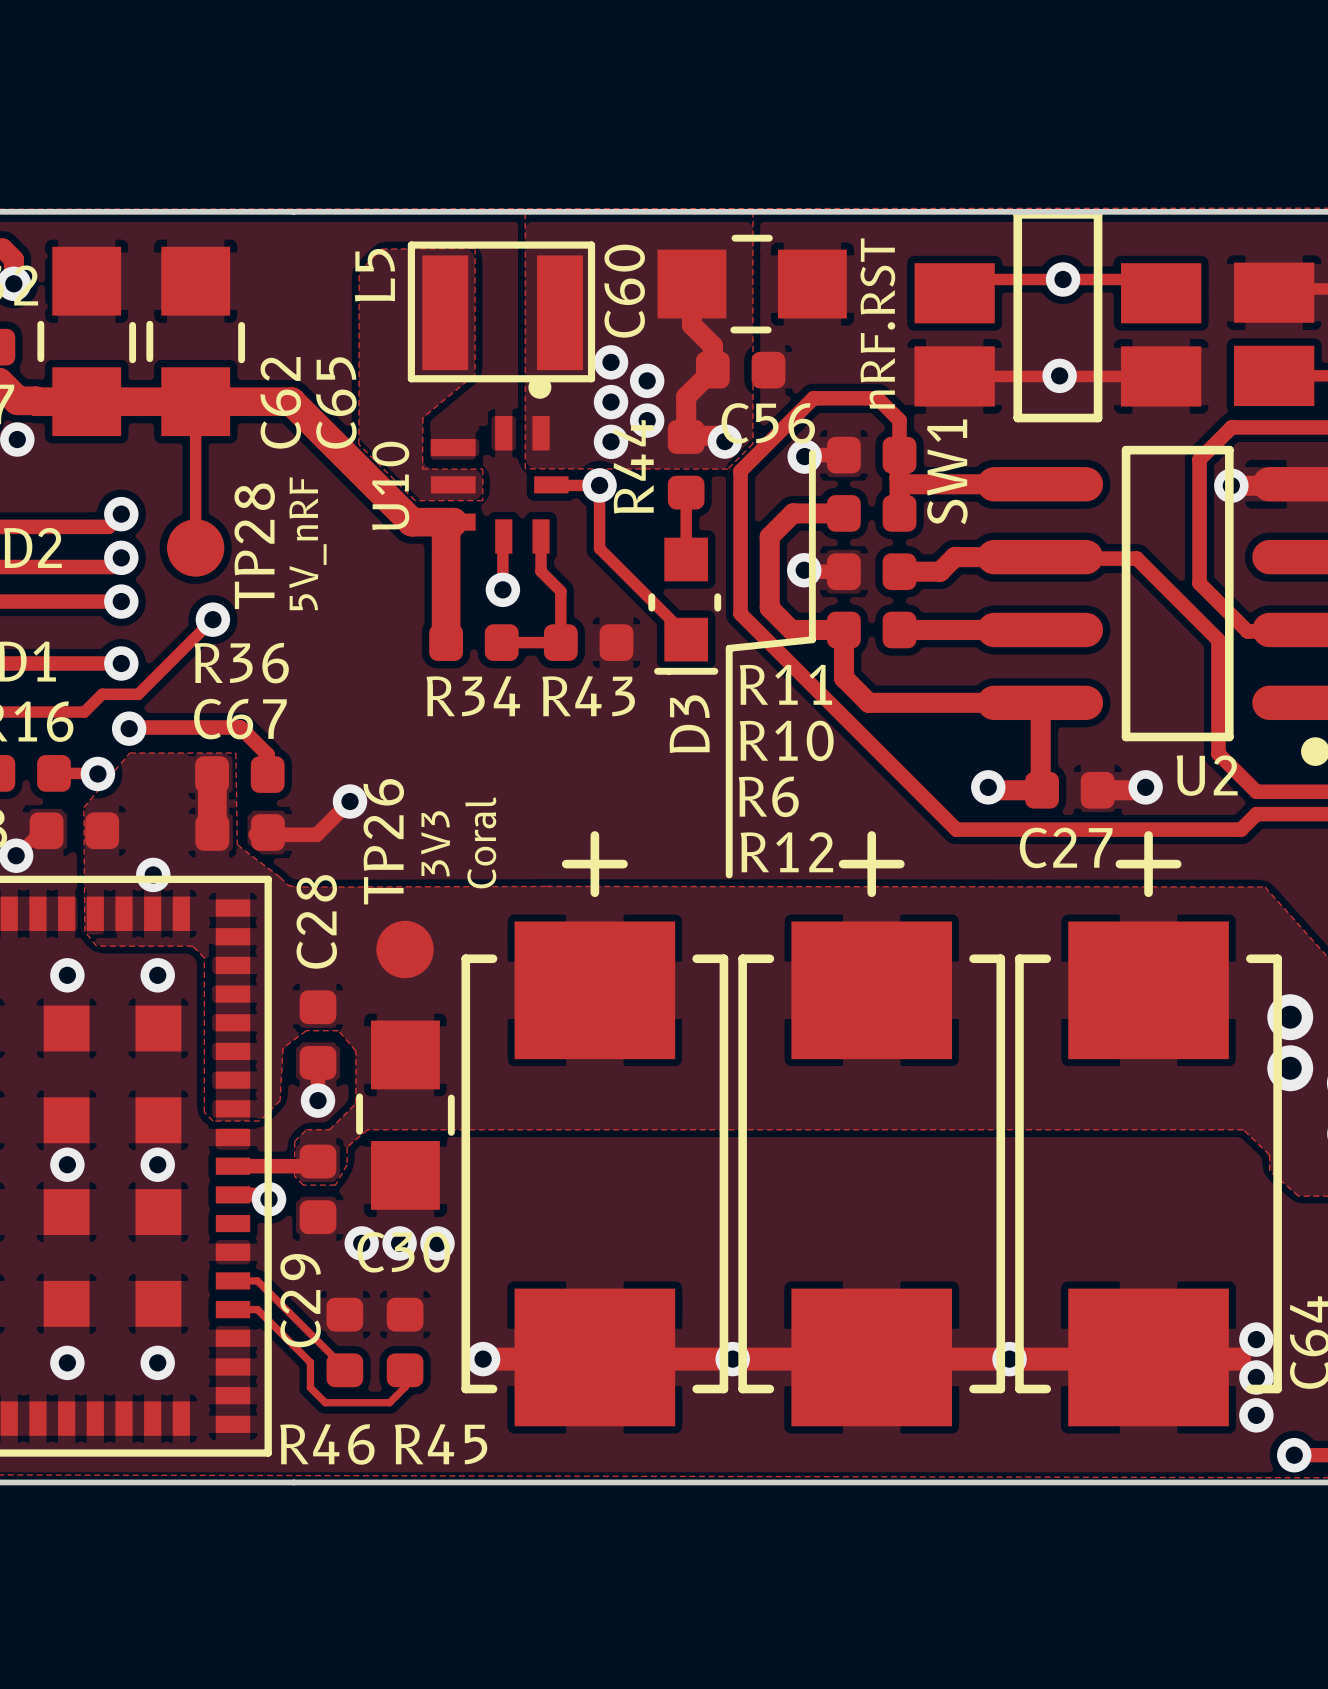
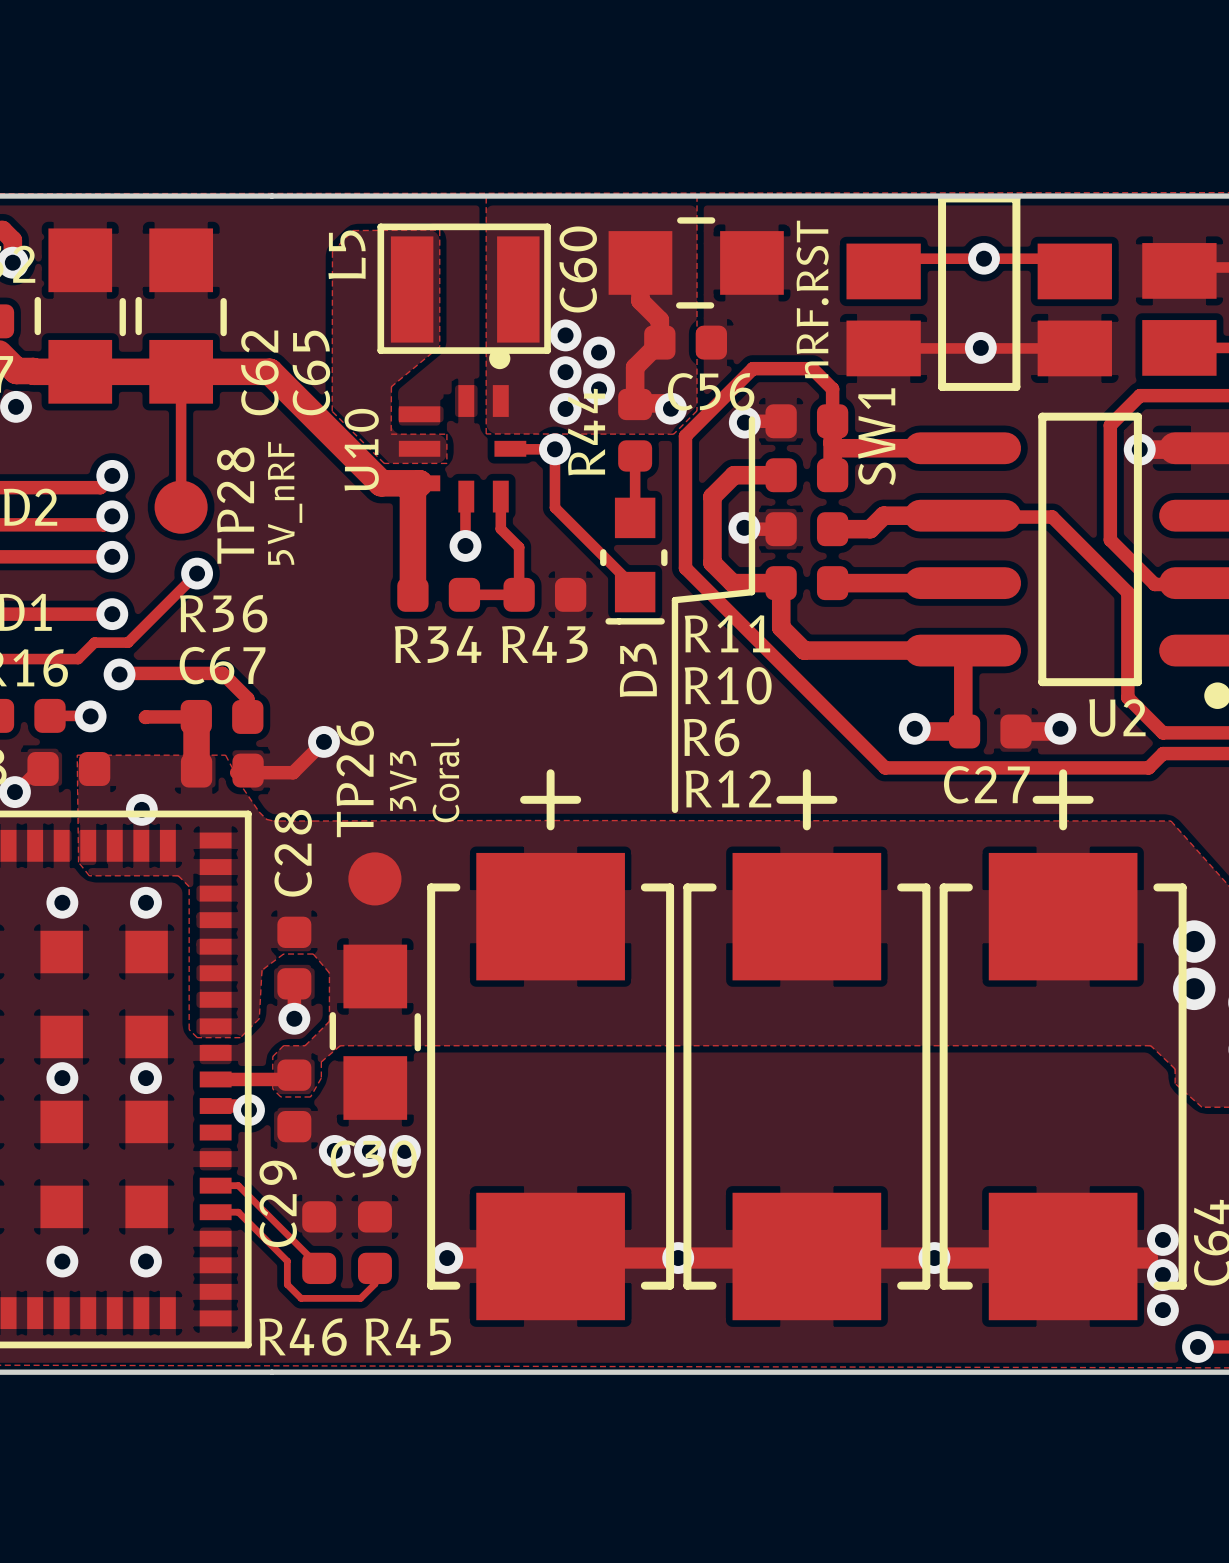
track: none -> (145, 716) (196, 716)
zone outline: (280, 877) (237, 844) (235, 753) (129, 753) (83, 807) (84, 931) -> (259, 811) (243, 788) (225, 755) (77, 755) (78, 862)

